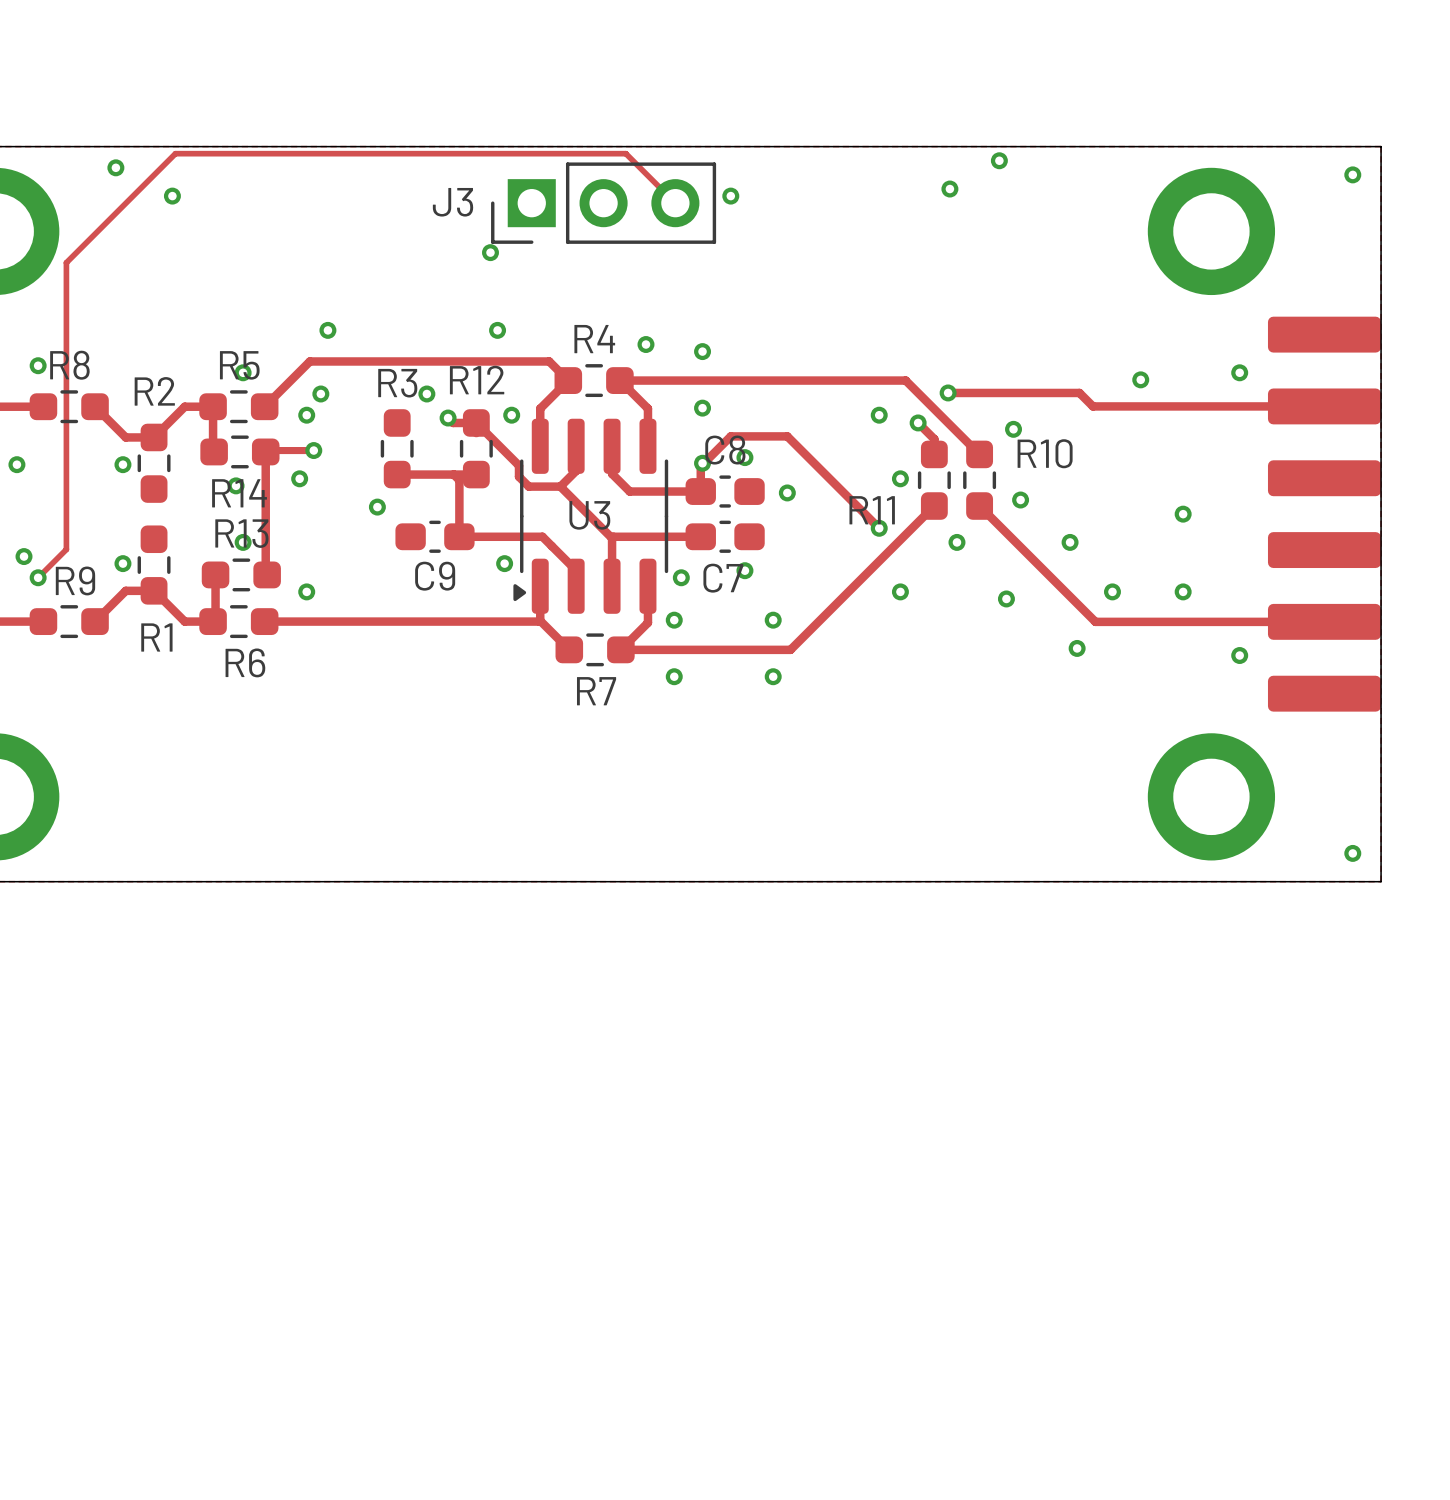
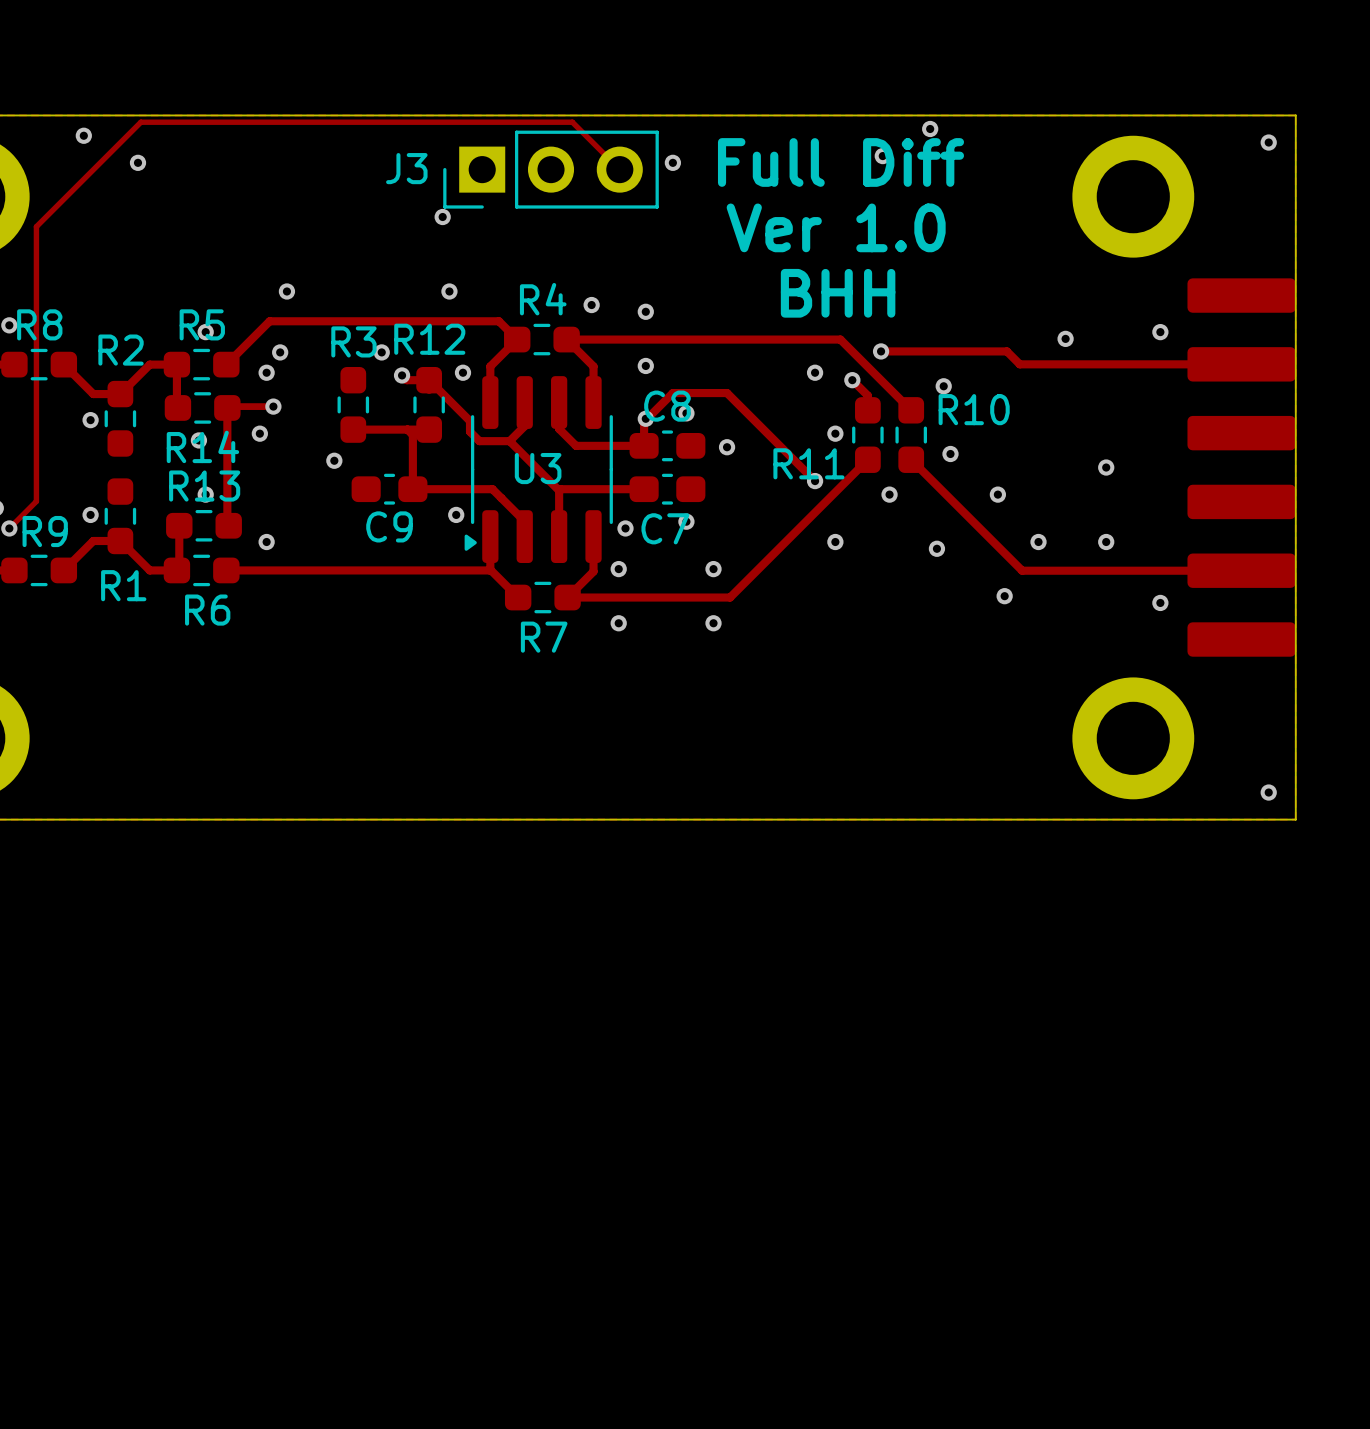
text: none -> Full Diff (840, 162)
text: none -> Ver 1.0 (836, 227)
text: none -> BHH (838, 293)

